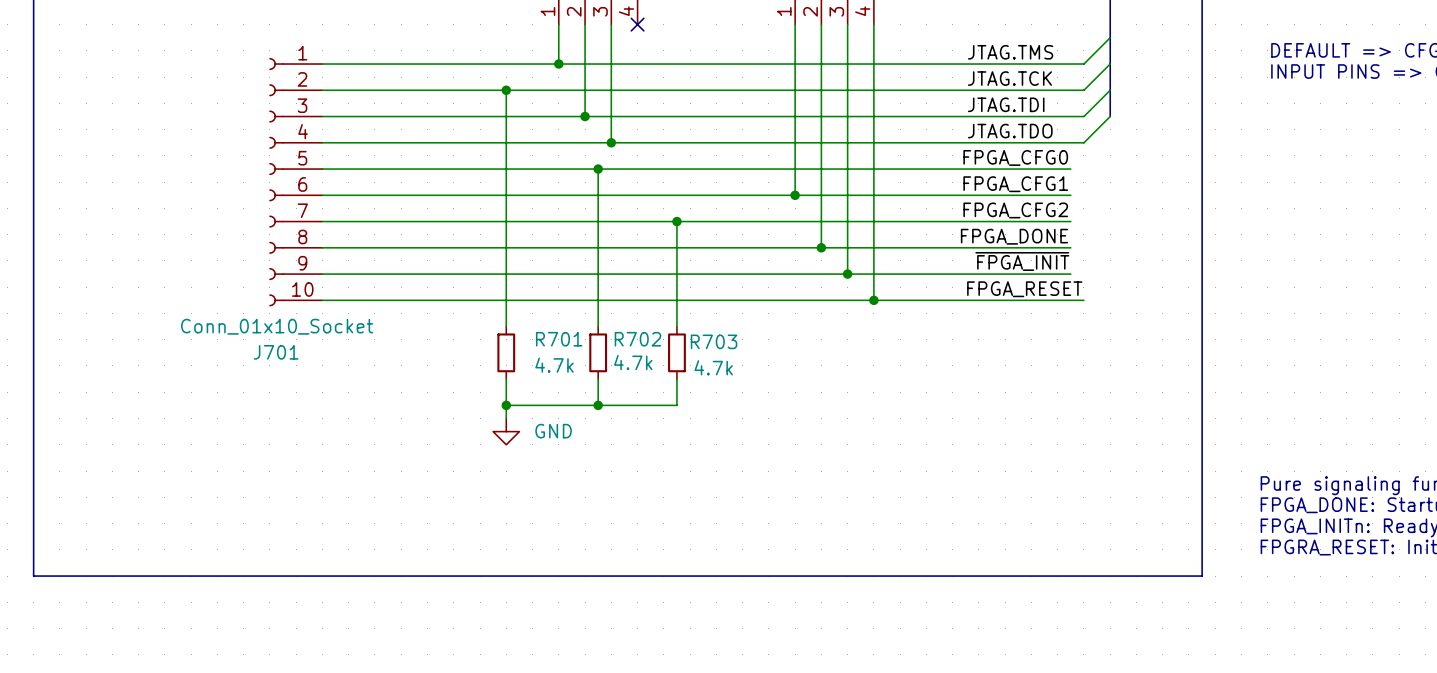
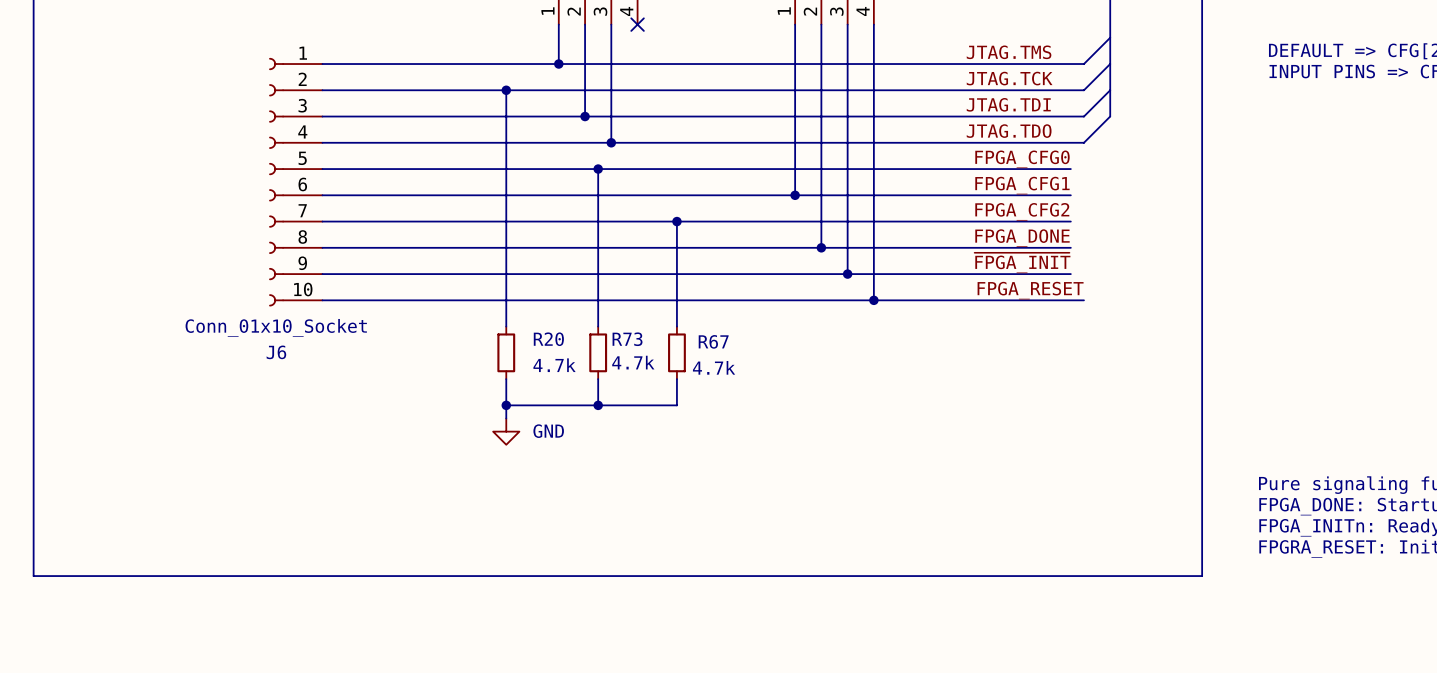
R701 name: R701 (559, 339) -> R20 (548, 339)
R702 name: R702 (637, 339) -> R73 (627, 339)
R703 name: R703 (714, 341) -> R67 (713, 341)
J701 name: J701 (276, 352) -> J6 (276, 352)

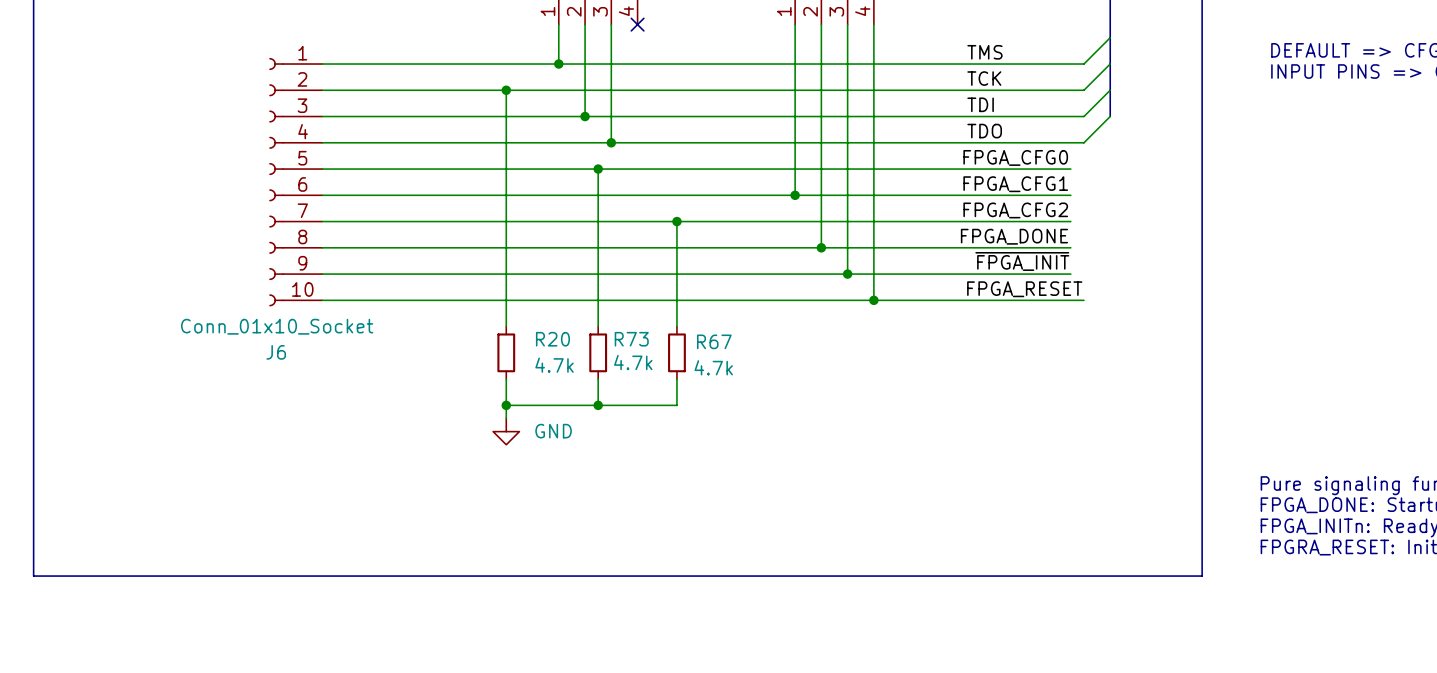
label: JTAG.TMS (1009, 52) -> TMS (984, 52)
label: JTAG.TCK (1009, 78) -> TCK (984, 78)
label: JTAG.TDI (1008, 104) -> TDI (980, 104)
label: JTAG.TDO (1009, 131) -> TDO (984, 131)

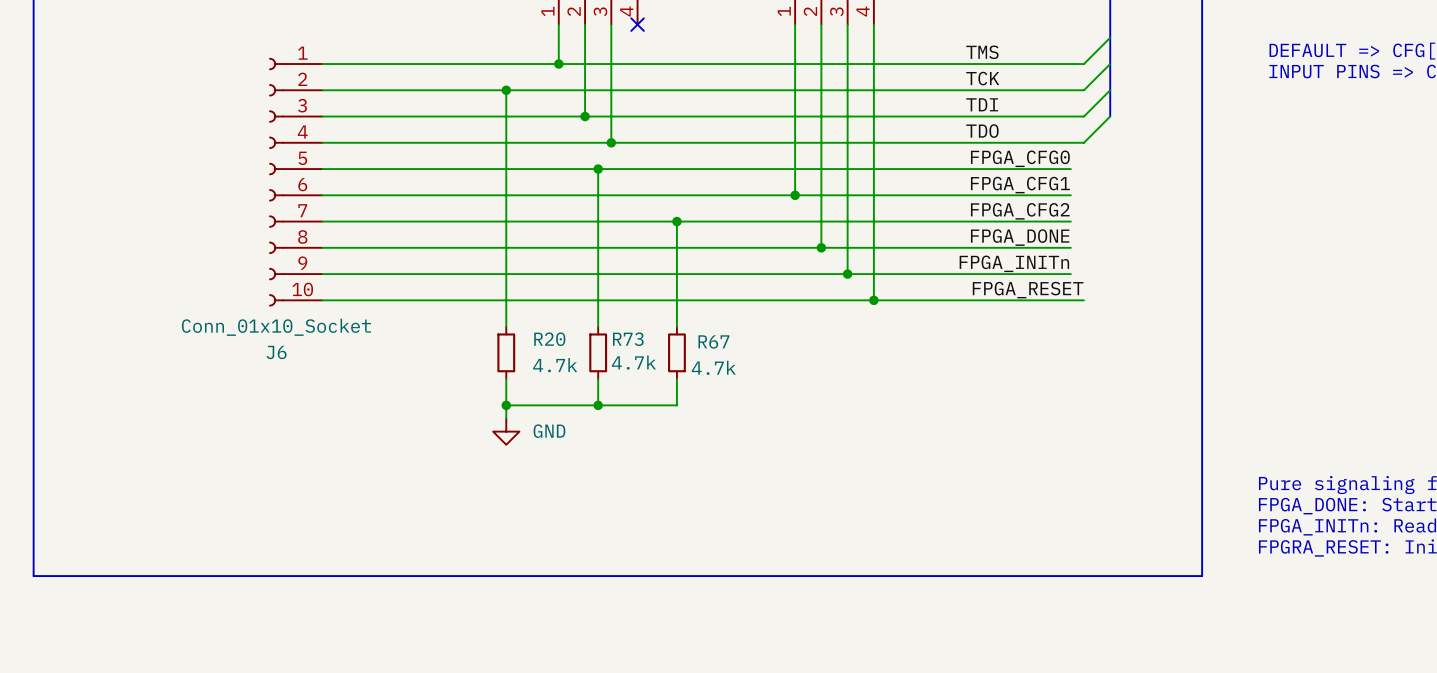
label: ~{FPGA_INIT} (1022, 261) -> FPGA_INITn (1014, 263)

